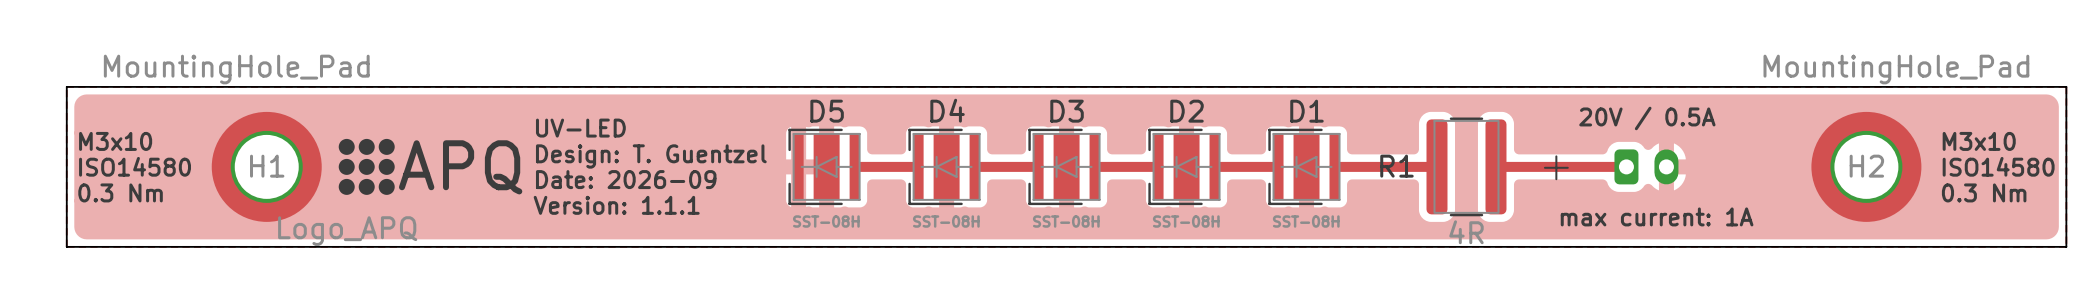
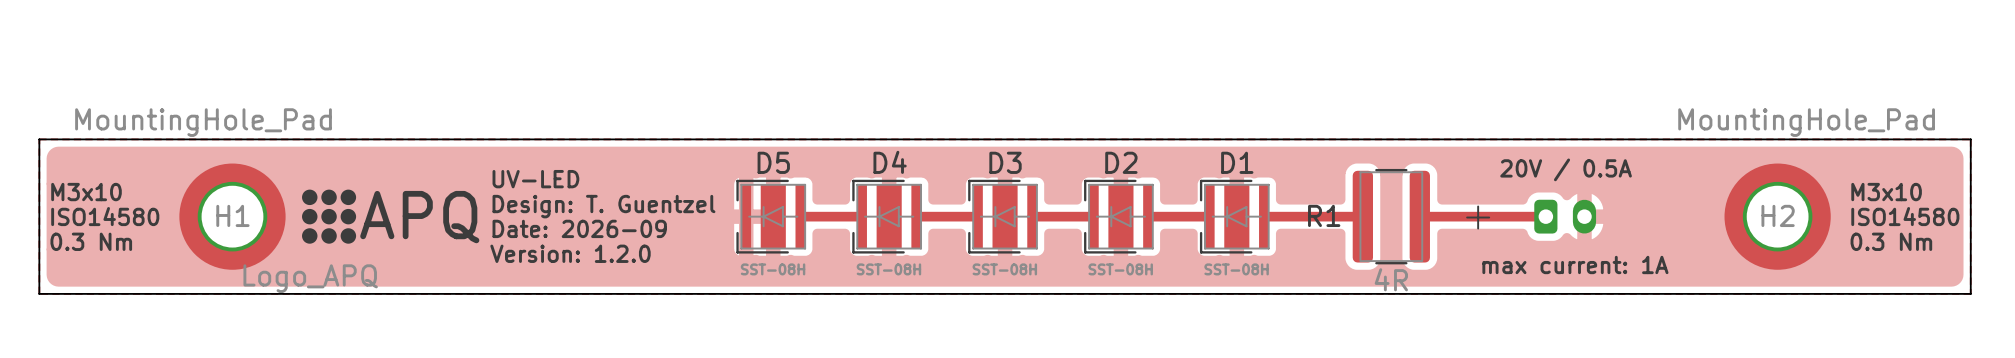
text: Version: 1.1.1 (616, 205) -> Version: 1.2.0 (570, 253)

